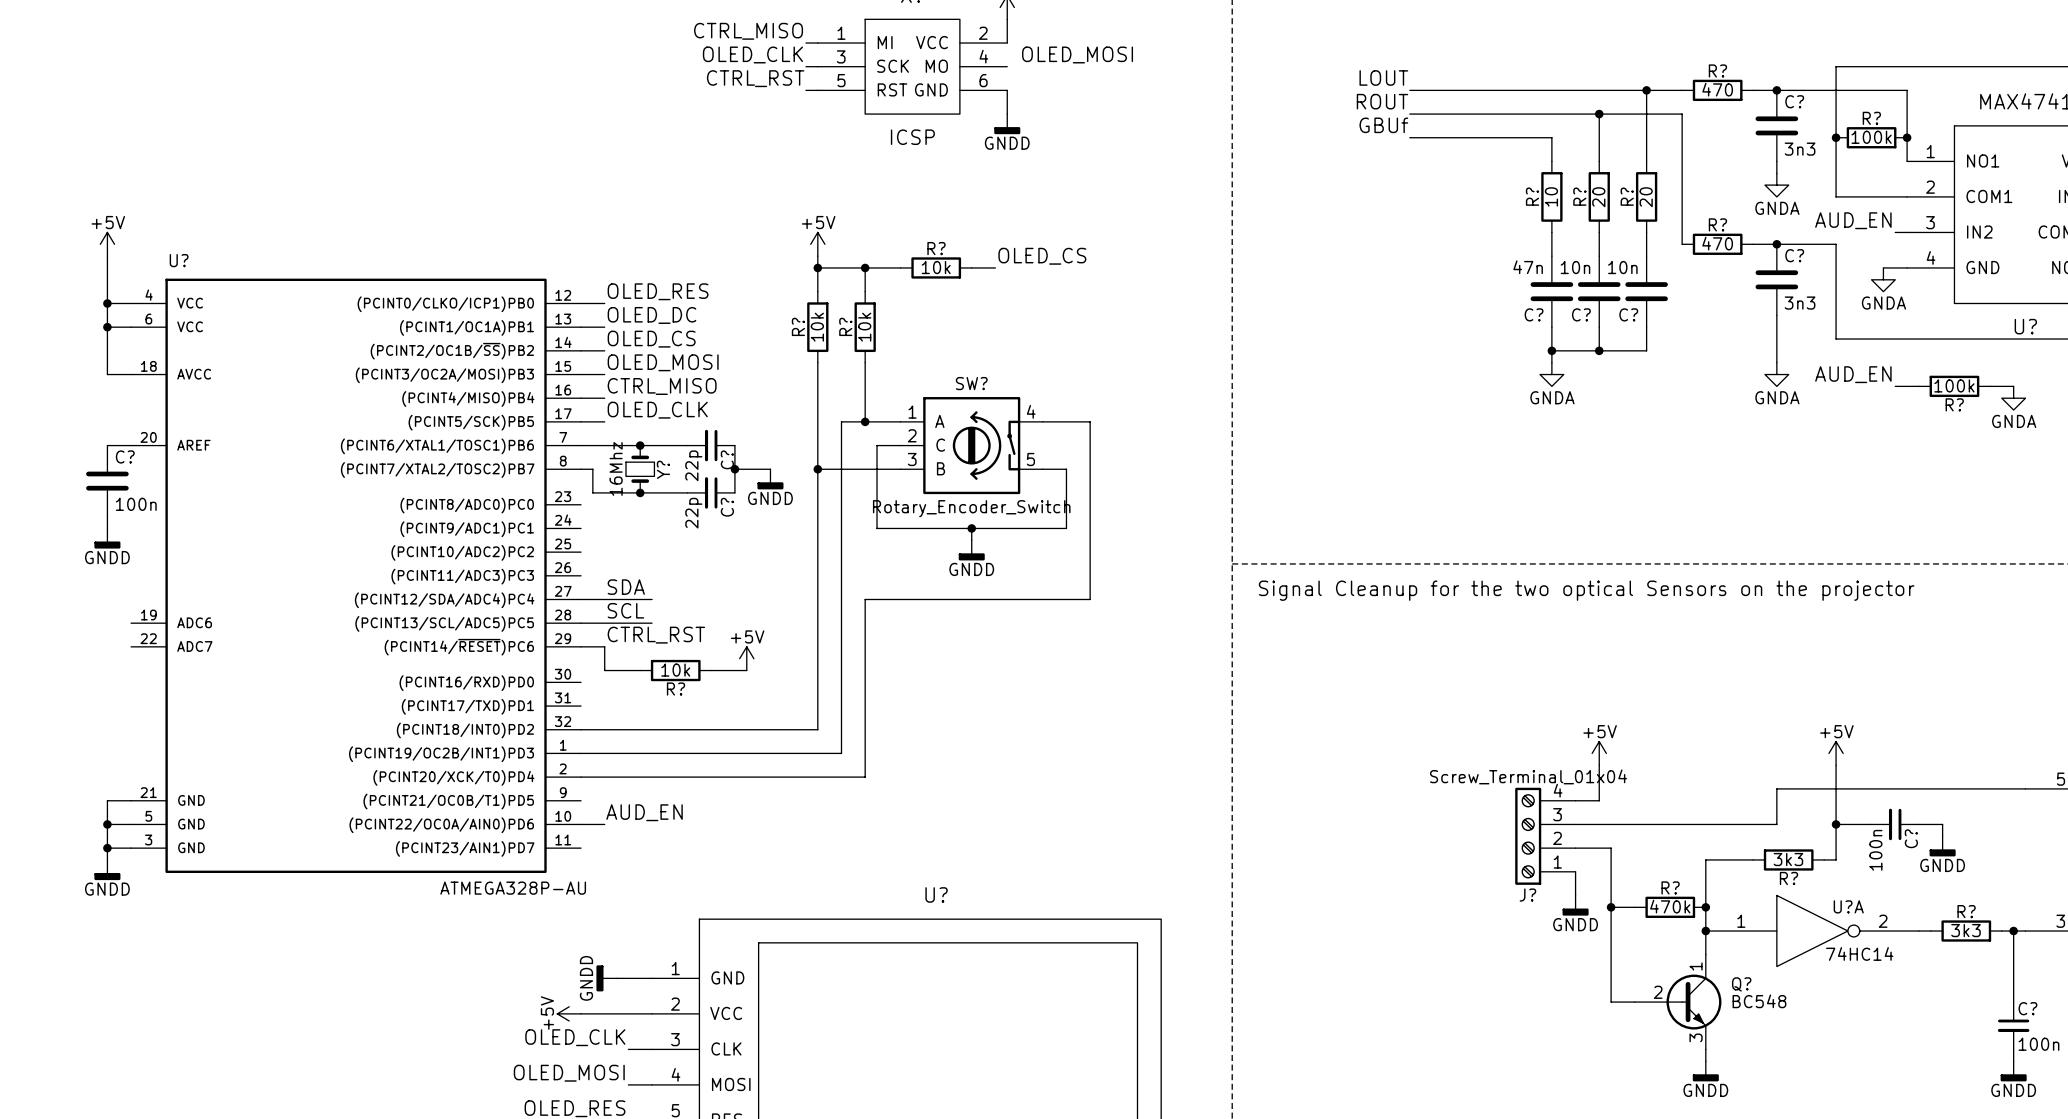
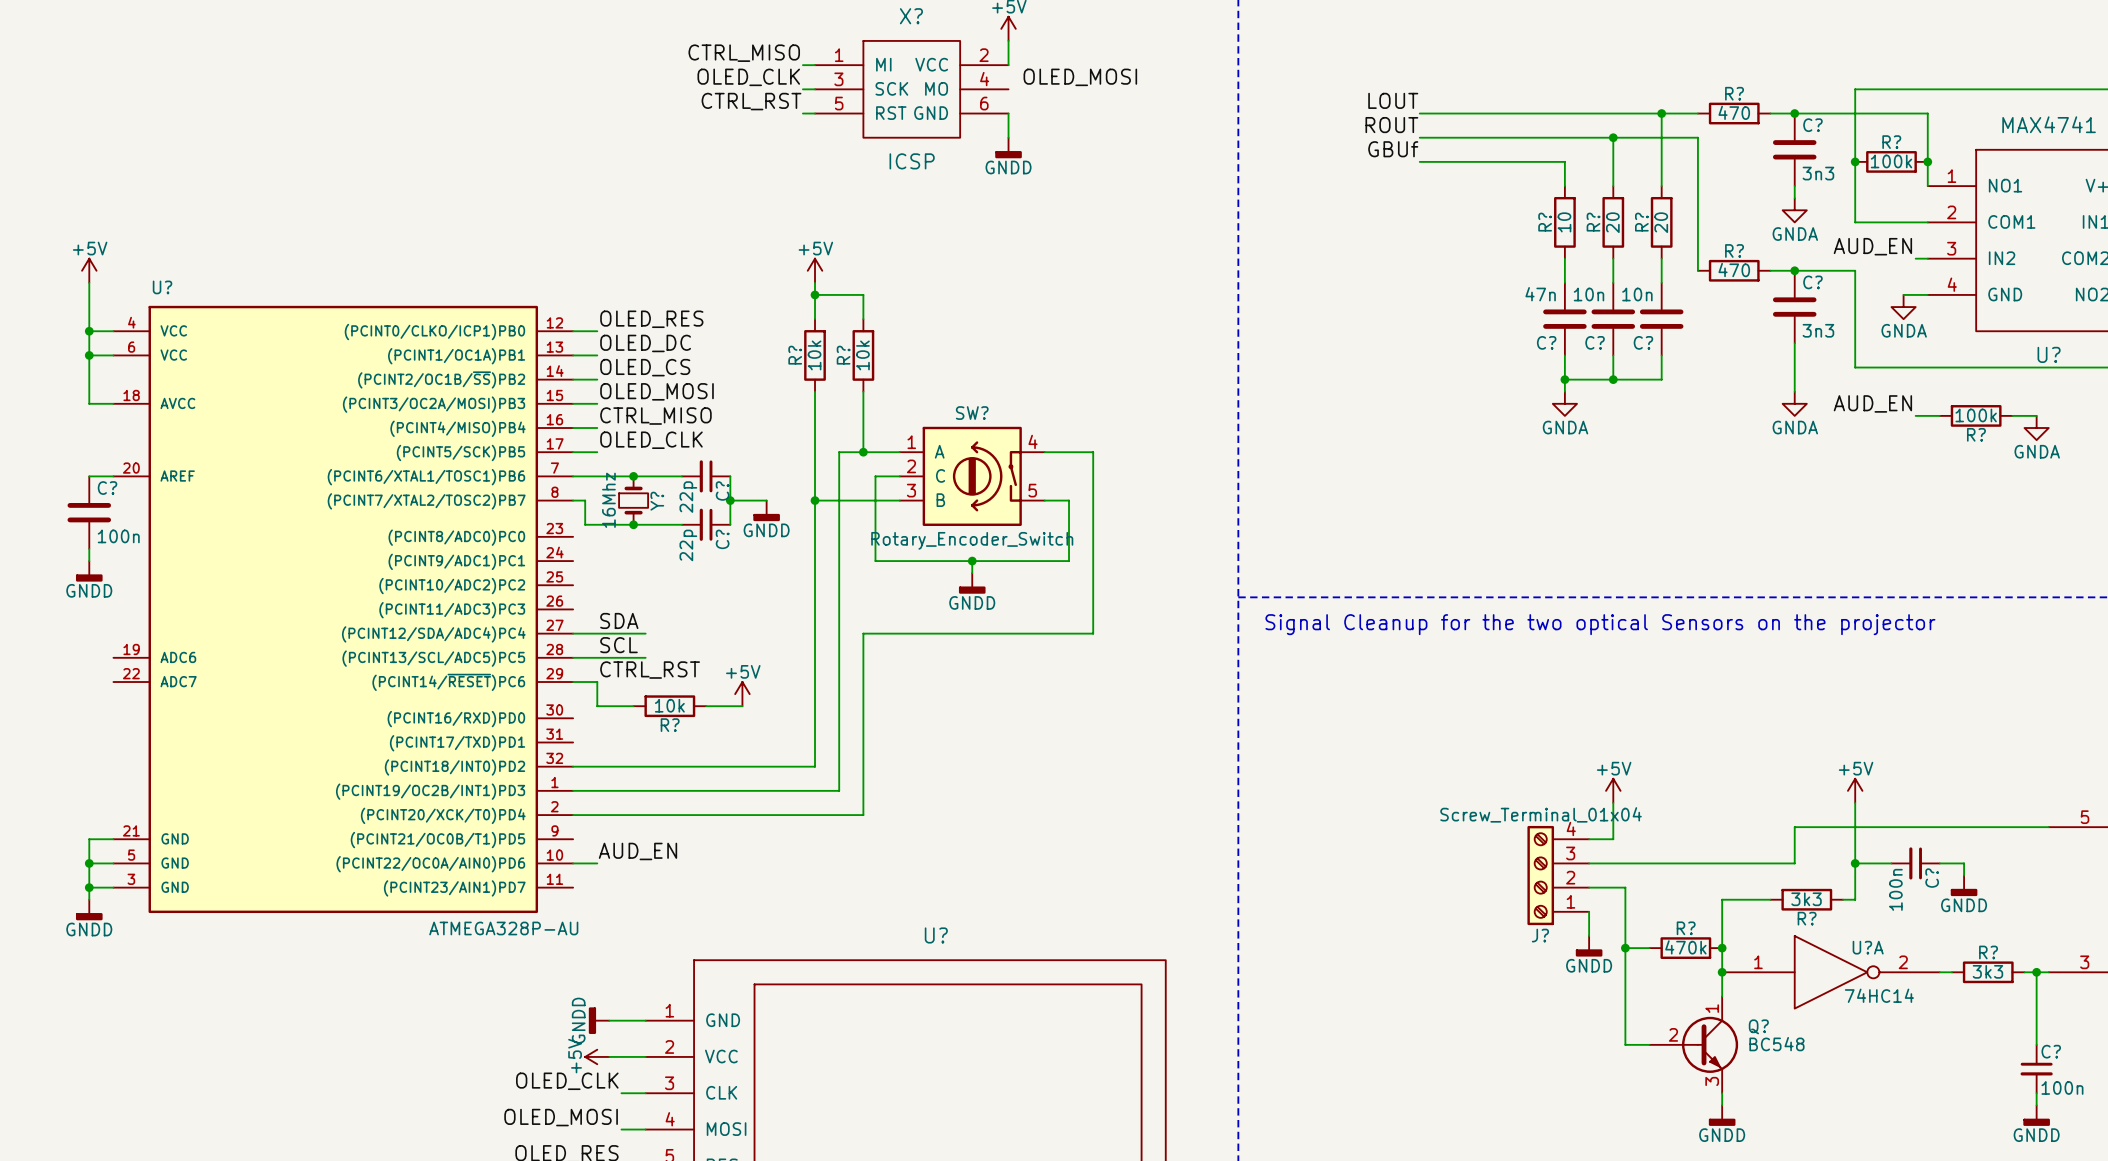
label: OLED_CS (1042, 256) -> none
wire: (865, 267) (900, 267) -> none
junction: (865, 267) -> none
R?: 10k (936, 267) -> none
wire: (971, 267) (995, 267) -> none
power symbol position: +5V (569, 1013) -> +5V (597, 1056)

